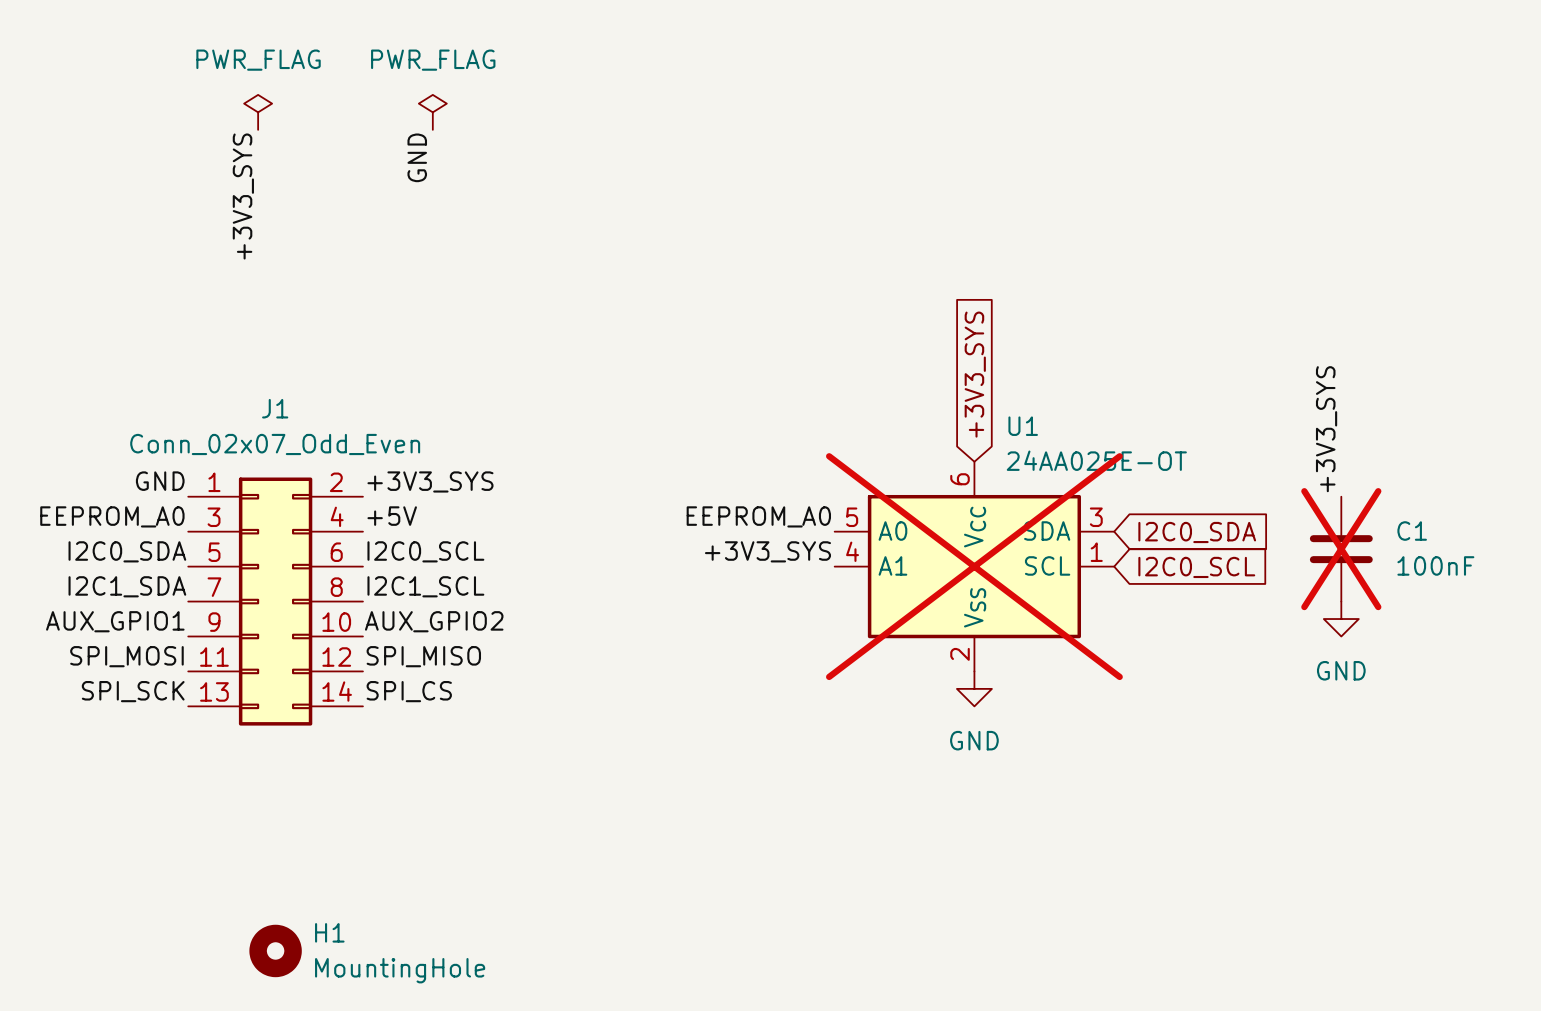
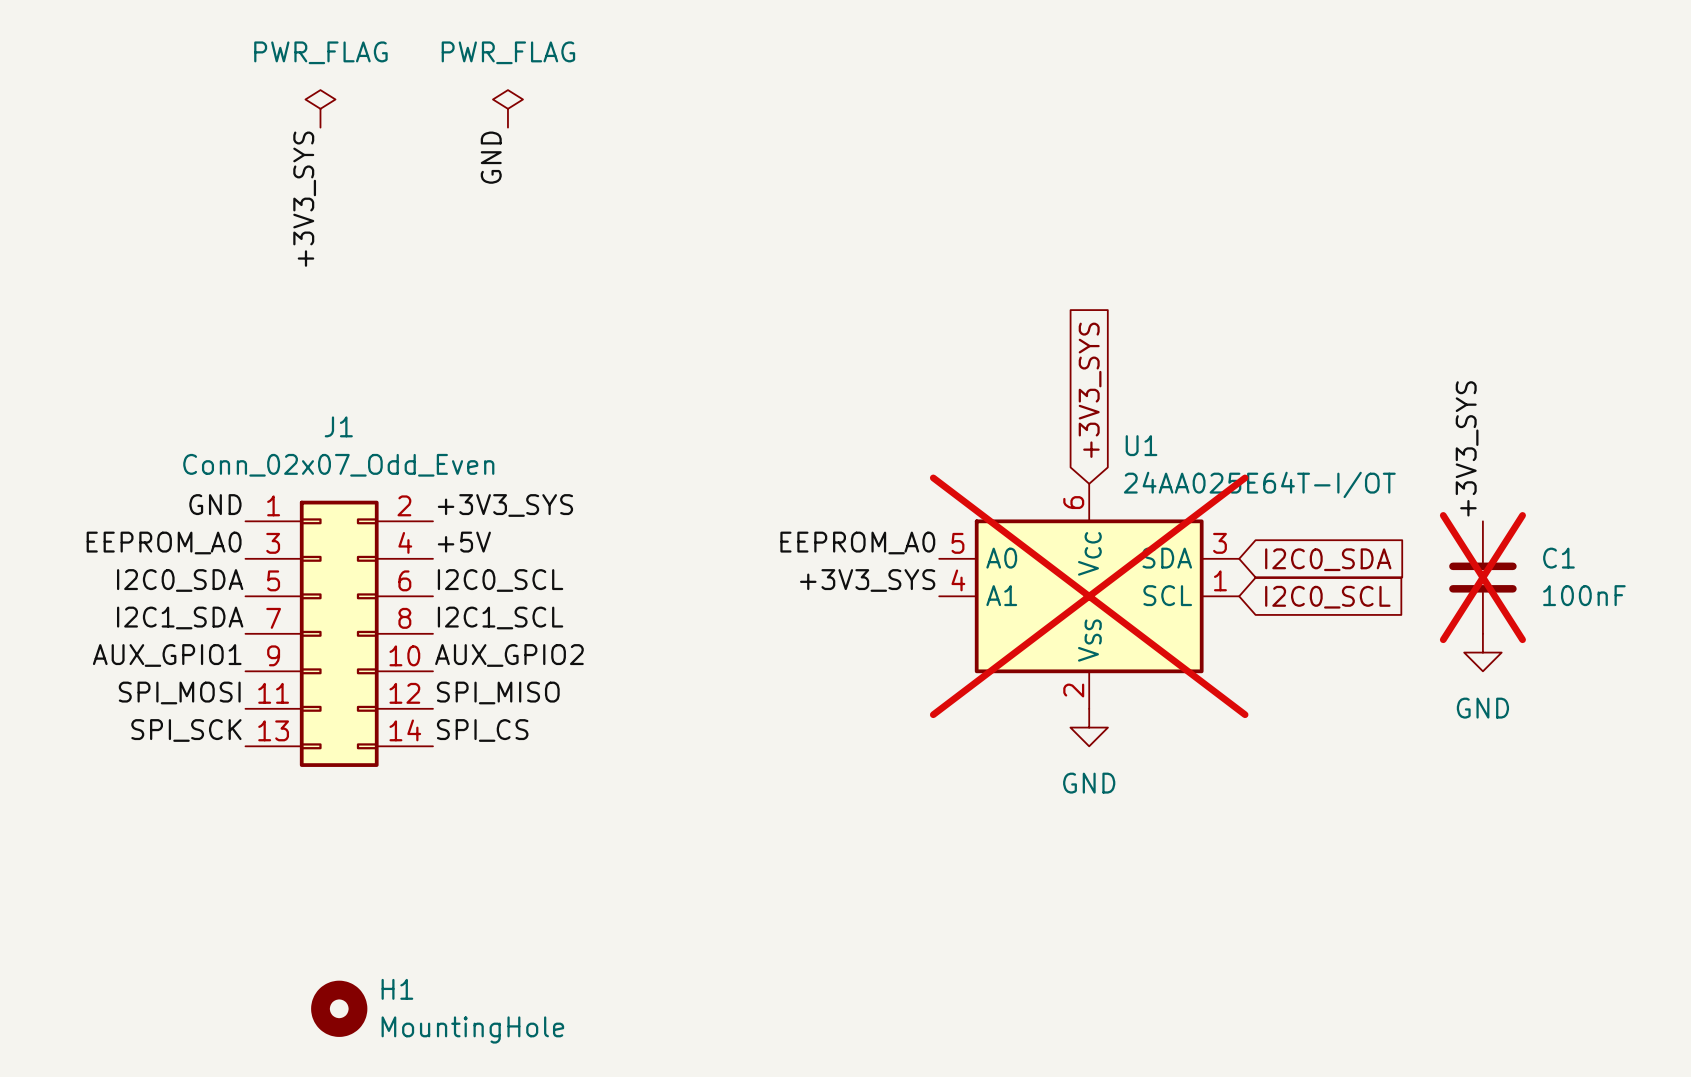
U1 value: 24AA025E-OT (1096, 460) -> 24AA025E64T-I/OT (1259, 484)

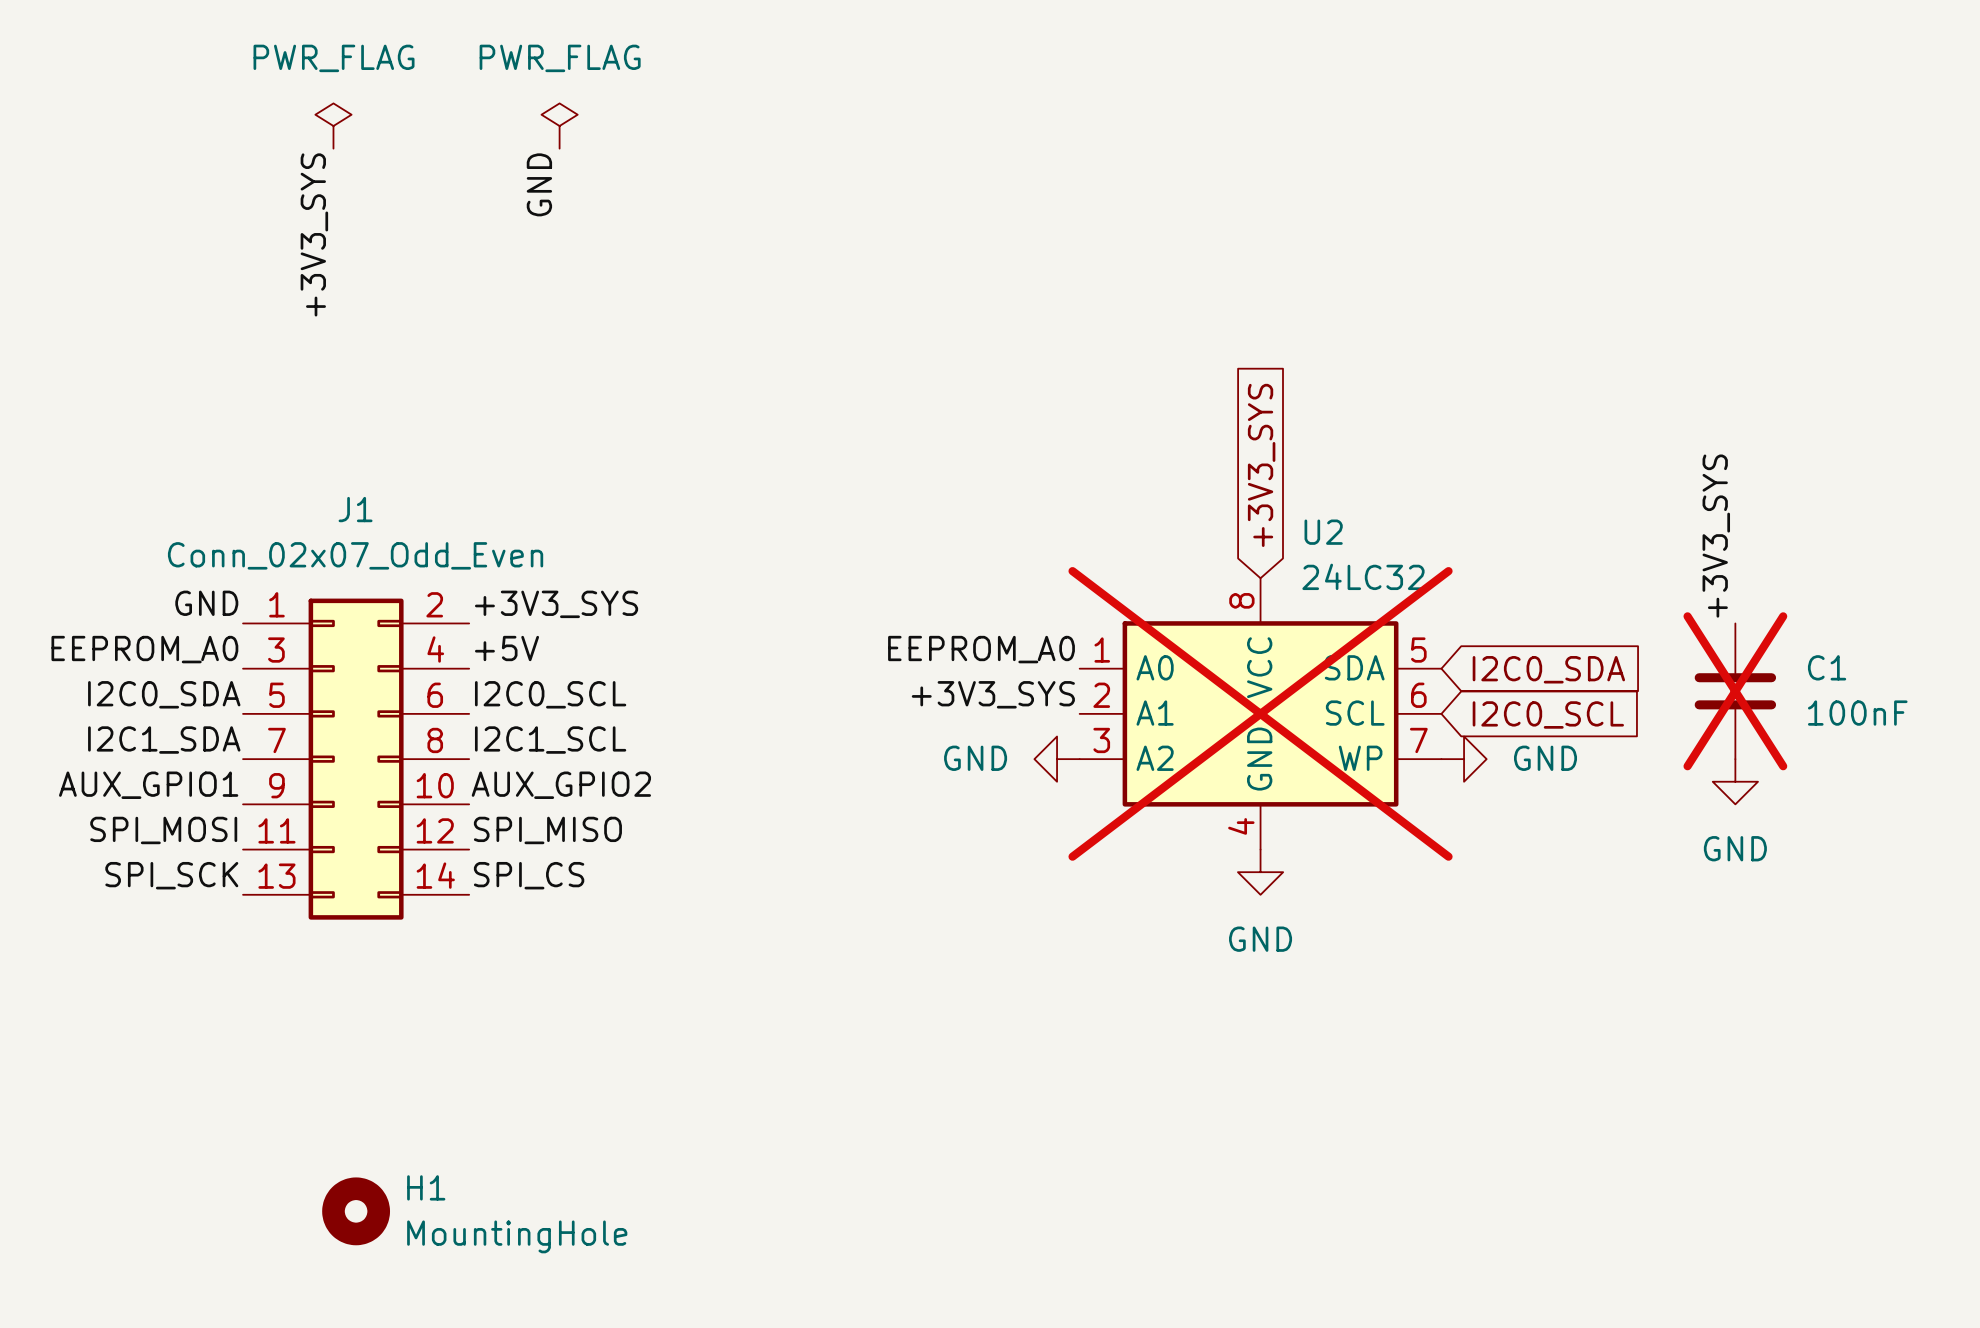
U1: 24AA025E64T-I/OT (1089, 596) -> none
U2: none -> 24LC32 (1260, 713)
power symbol: none -> GND (1057, 759)
power symbol: none -> GND (1464, 759)

